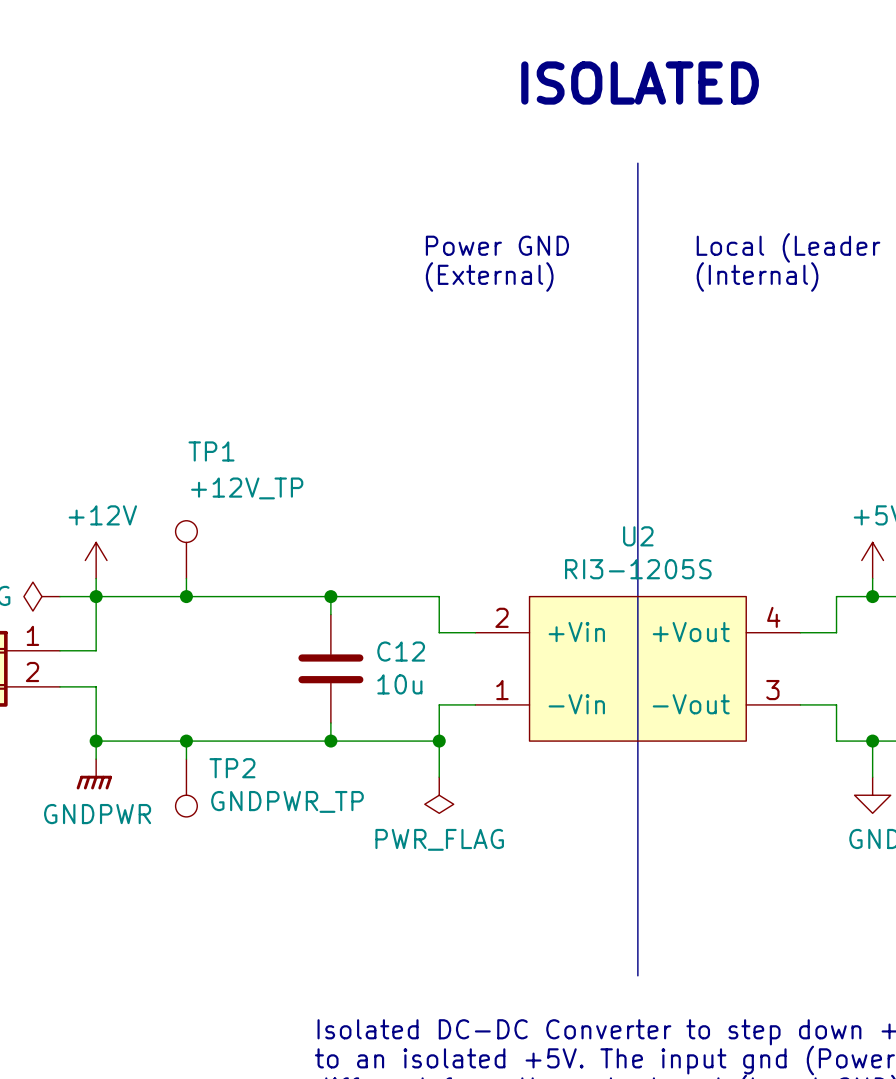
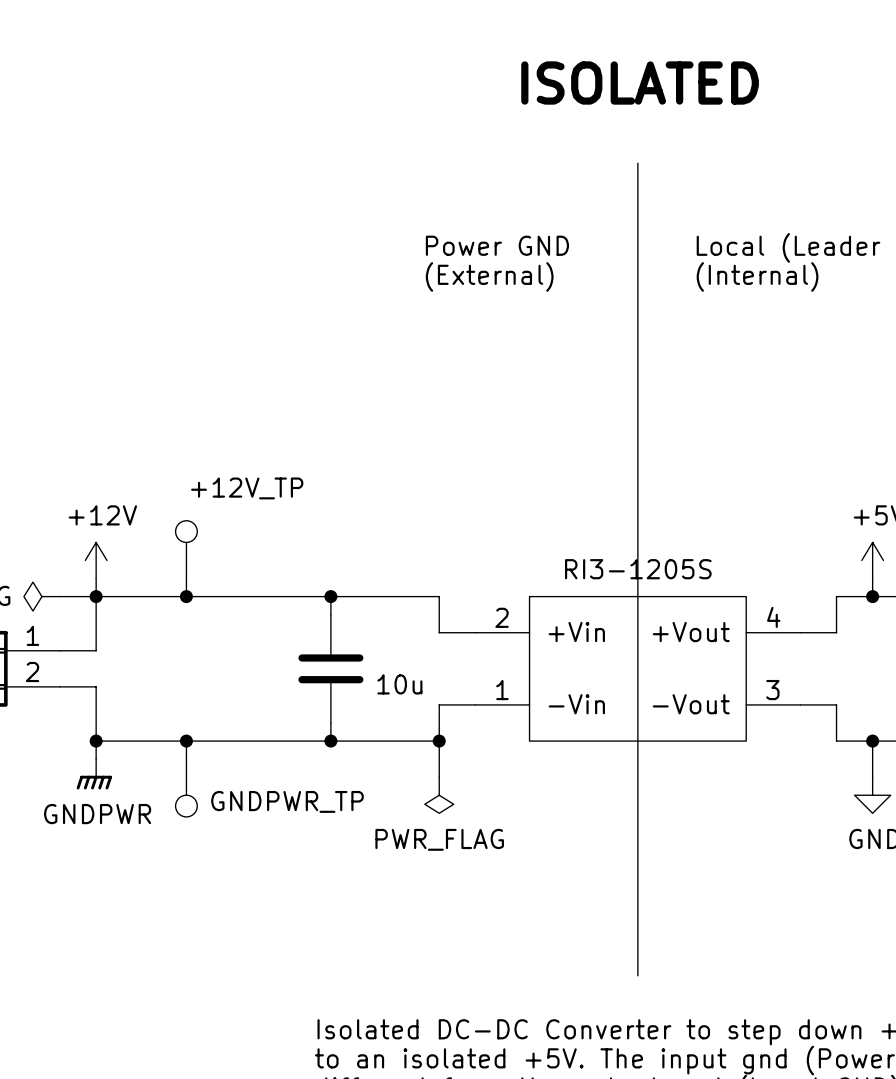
TP1 name: TP1 (211, 451) -> none
U2 name: U2 (638, 536) -> none
C12 name: C12 (401, 651) -> none
TP2 name: TP2 (232, 768) -> none

